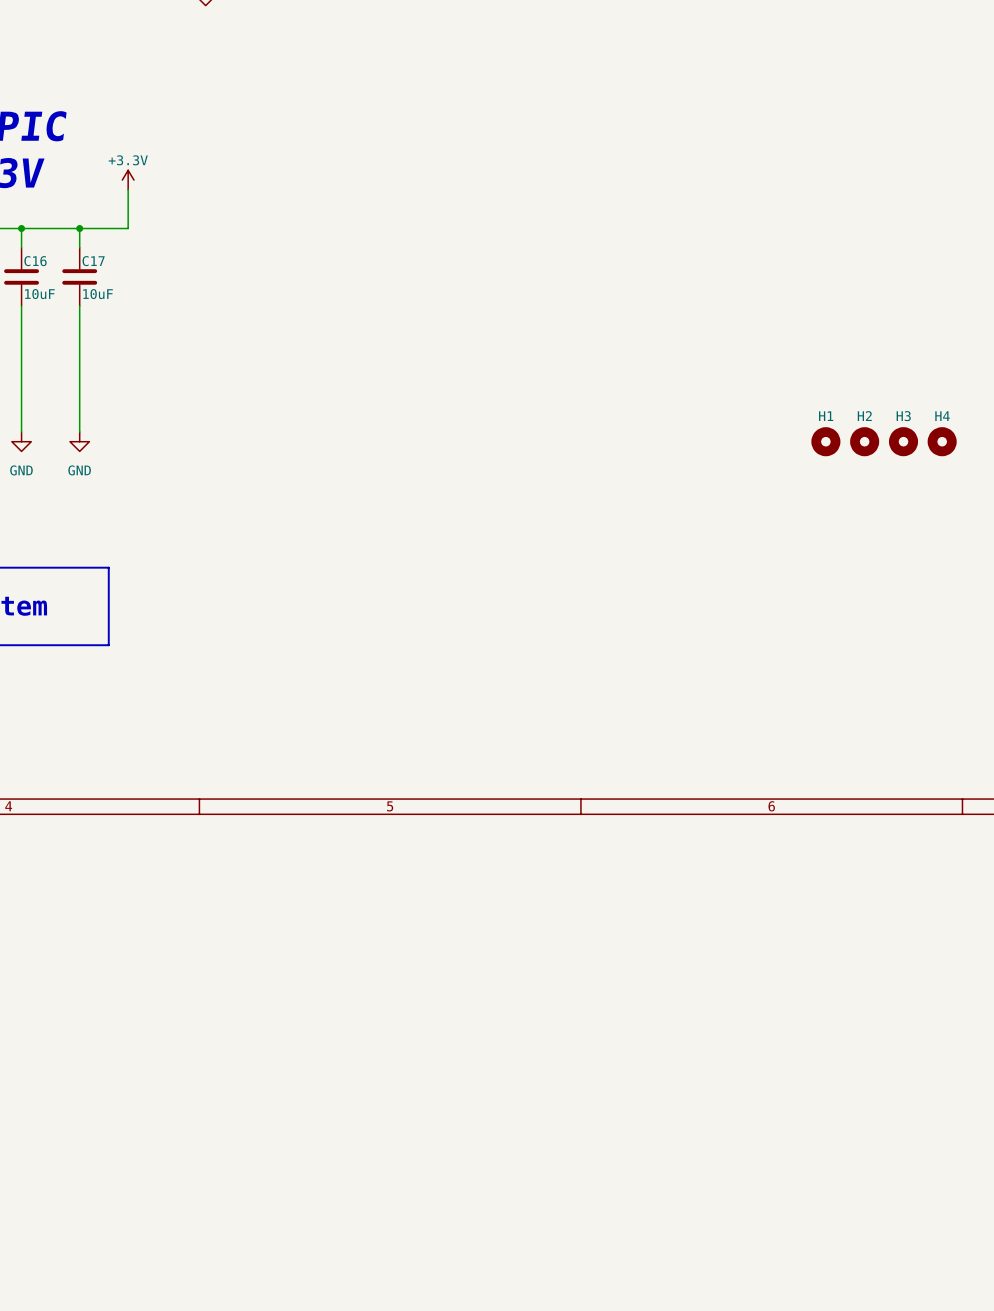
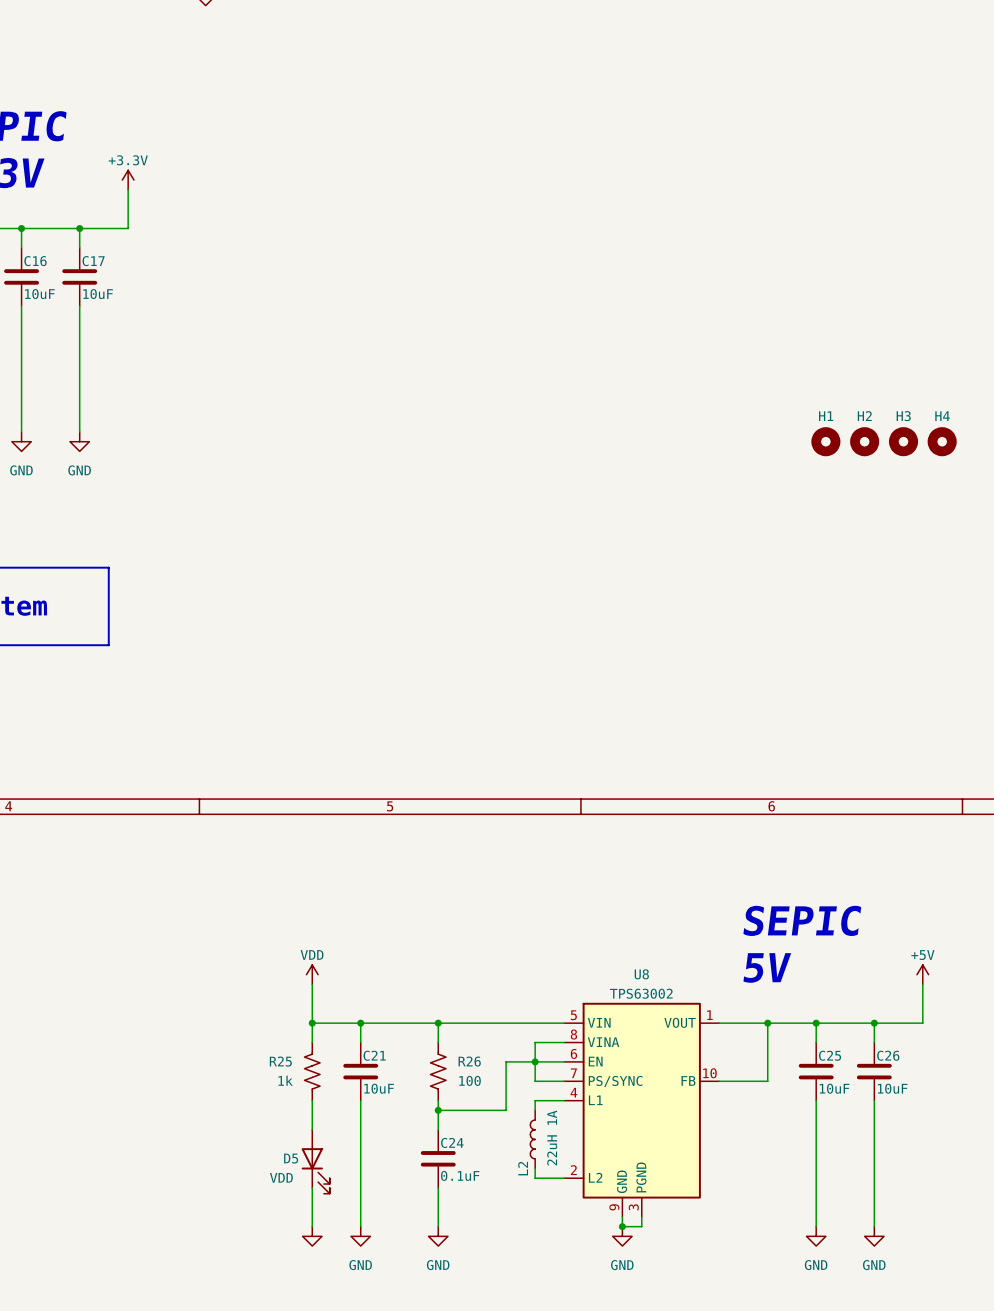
text: none -> SEPIC (802, 920)
text: none -> 5V (767, 967)
power symbol: none -> VDD (312, 974)
power symbol: none -> +5V (922, 974)
wire: none -> (312, 984) (312, 1042)
wire: none -> (922, 984) (922, 1023) (719, 1023)
wire: none -> (312, 1023) (564, 1023)
junction: none -> (312, 1023)
wire: none -> (360, 1023) (360, 1042)
junction: none -> (360, 1023)
wire: none -> (438, 1023) (438, 1042)
junction: none -> (438, 1023)
wire: none -> (767, 1023) (767, 1081) (719, 1081)
junction: none -> (767, 1023)
wire: none -> (816, 1023) (816, 1042)
junction: none -> (816, 1023)
wire: none -> (874, 1023) (874, 1042)
junction: none -> (874, 1023)
wire: none -> (564, 1042) (535, 1042) (535, 1081) (564, 1081)
junction: none -> (535, 1061)
wire: none -> (564, 1061) (506, 1061) (506, 1110) (438, 1110)
R25: none -> 1k (312, 1071)
C21: none -> 10uF (360, 1071)
R26: none -> 100 (438, 1071)
C25: none -> 10uF (816, 1071)
C26: none -> 10uF (874, 1071)
wire: none -> (312, 1100) (312, 1129)
wire: none -> (360, 1100) (360, 1226)
wire: none -> (438, 1100) (438, 1129)
wire: none -> (564, 1100) (535, 1100) (535, 1110)
wire: none -> (816, 1100) (816, 1226)
wire: none -> (874, 1100) (874, 1226)
U8: none -> TPS63002 (641, 1109)
junction: none -> (438, 1110)
L2: none -> 22uH 1A (532, 1139)
C24: none -> 0.1uF (438, 1158)
D5: none -> VDD (315, 1161)
wire: none -> (535, 1168) (535, 1178) (564, 1178)
wire: none -> (312, 1187) (312, 1226)
wire: none -> (438, 1187) (438, 1226)
wire: none -> (622, 1216) (622, 1226) (641, 1226) (641, 1216)
junction: none -> (622, 1226)
power symbol: none -> (312, 1236)
power symbol: none -> GND (360, 1236)
power symbol: none -> GND (438, 1236)
power symbol: none -> GND (622, 1236)
power symbol: none -> GND (816, 1236)
power symbol: none -> GND (874, 1236)

